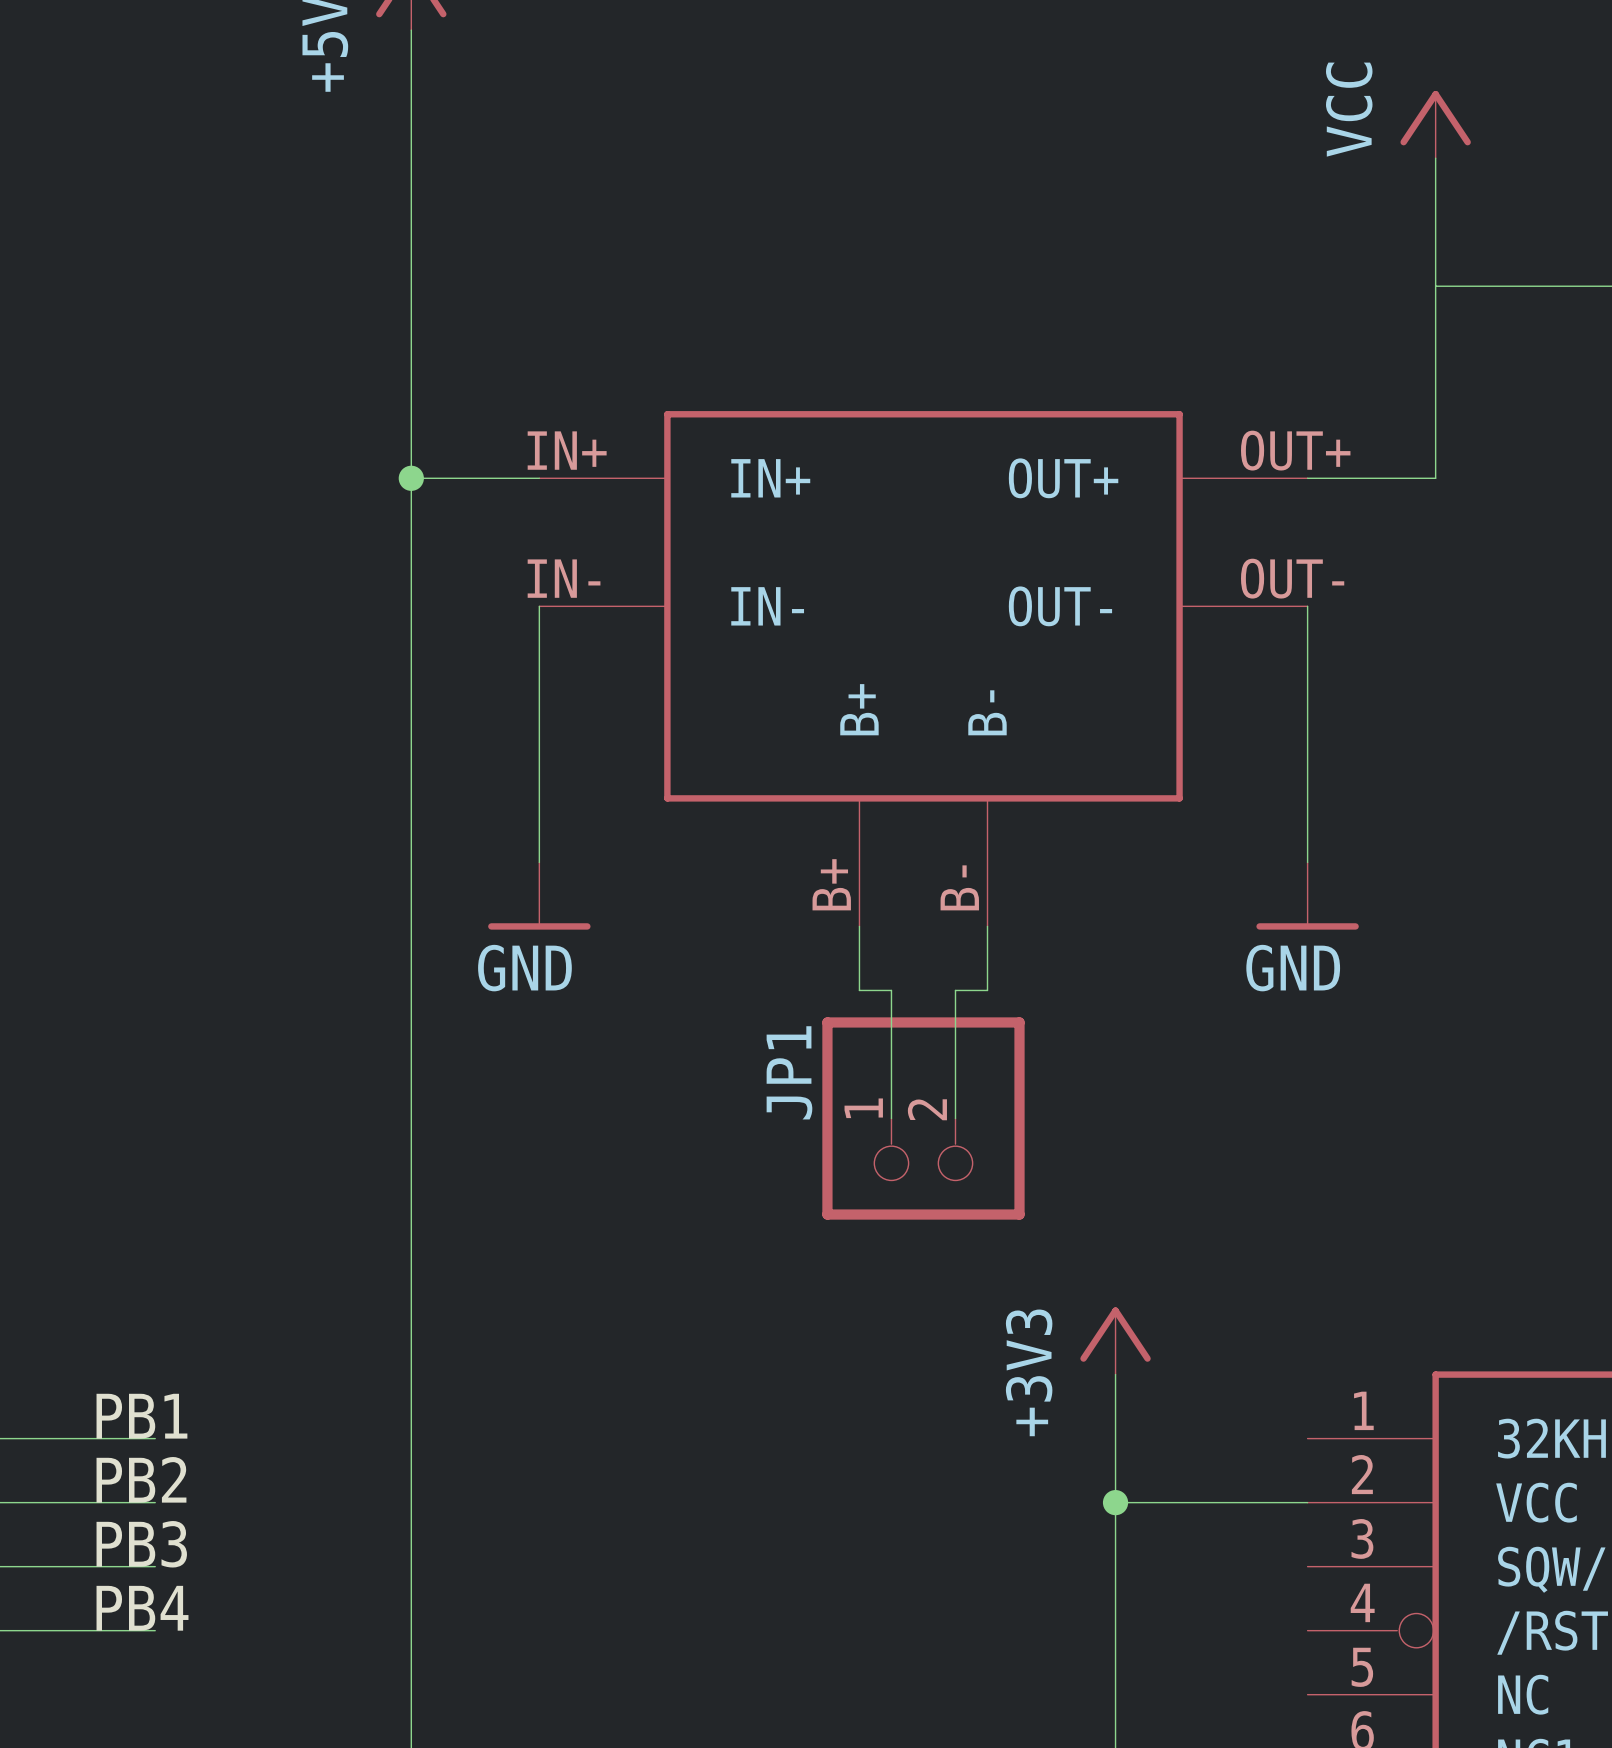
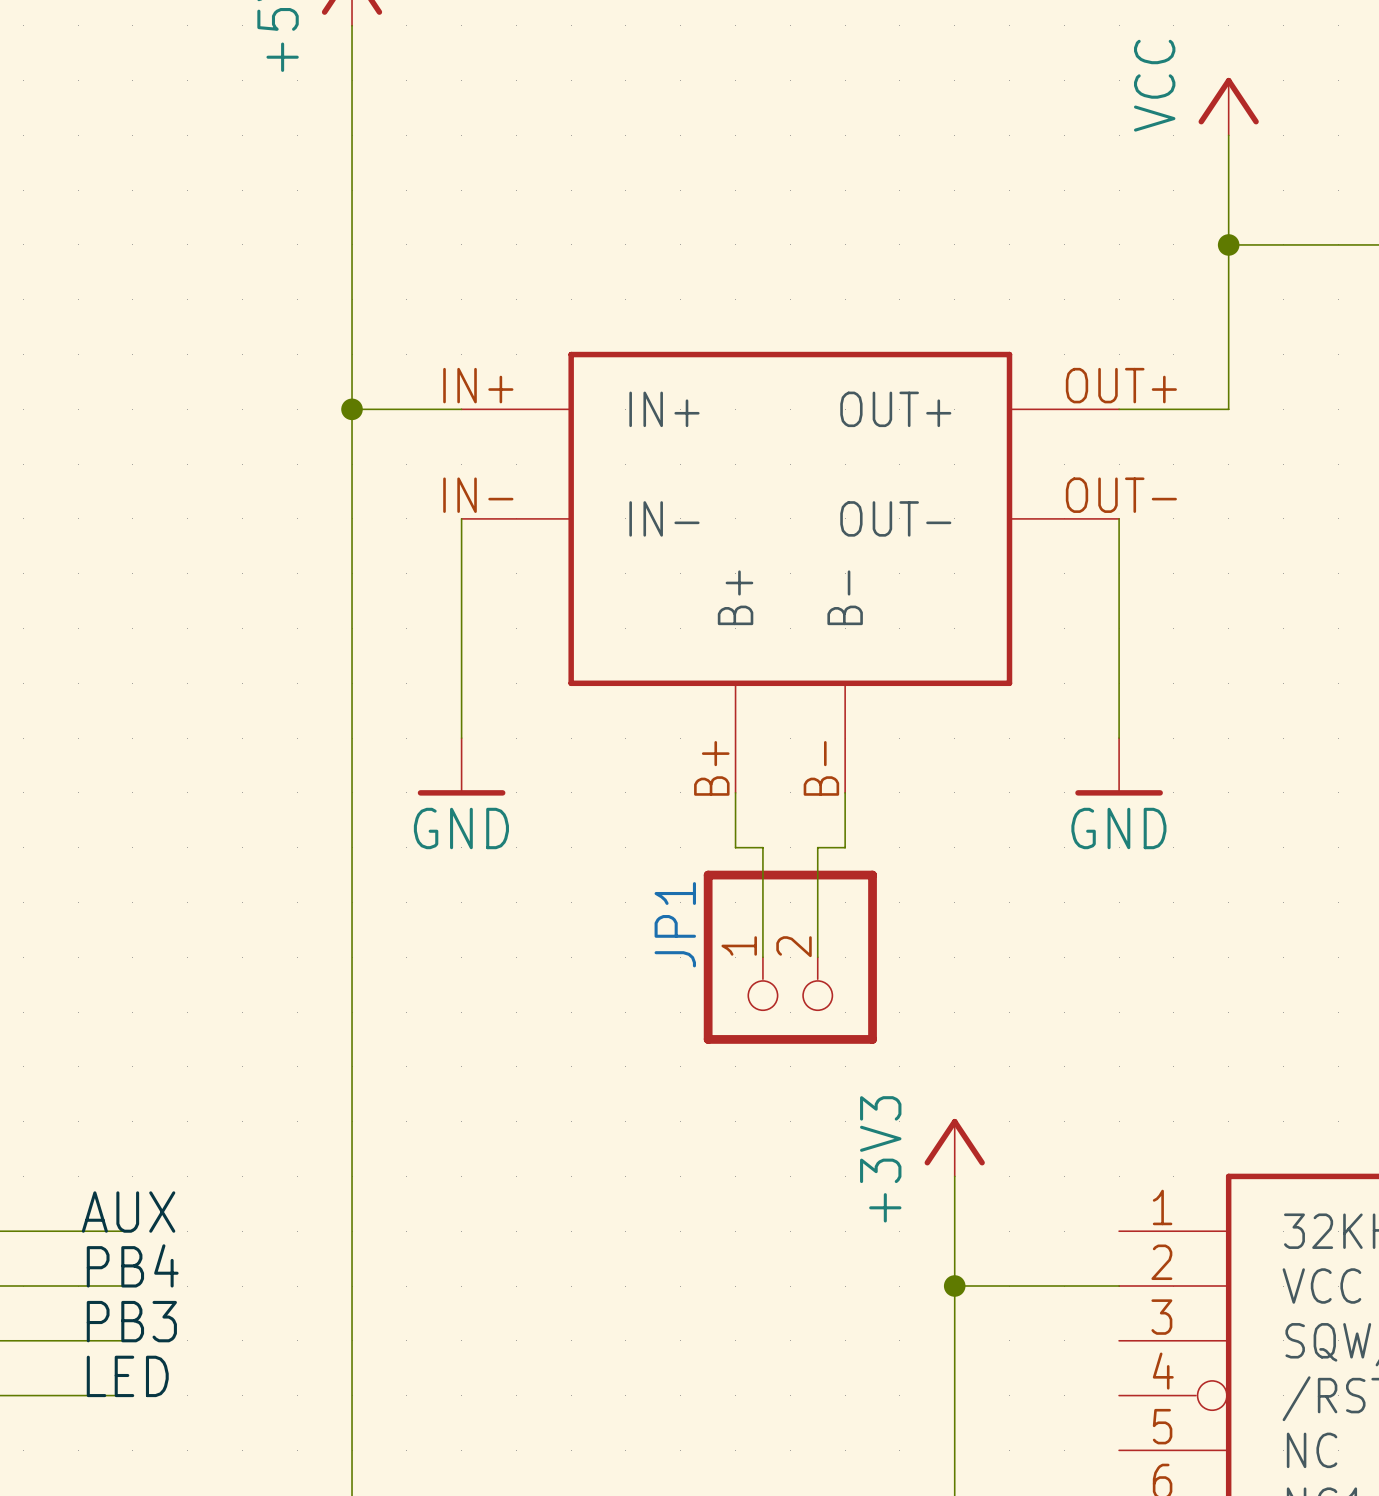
junction: none -> (1228, 244)
label: PB1 (141, 1416) -> AUX (128, 1212)
label: PB2 (141, 1479) -> PB4 (132, 1265)
label: PB4 (142, 1608) -> LED (127, 1376)

